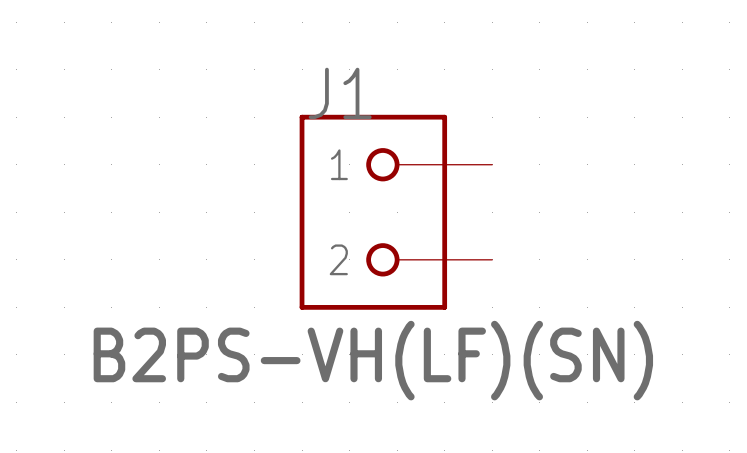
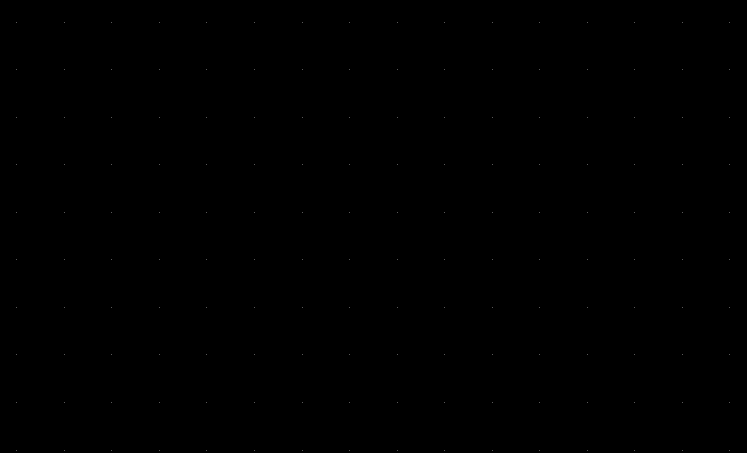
J1: B2PS-VH(LF)(SN) (395, 212) -> none

